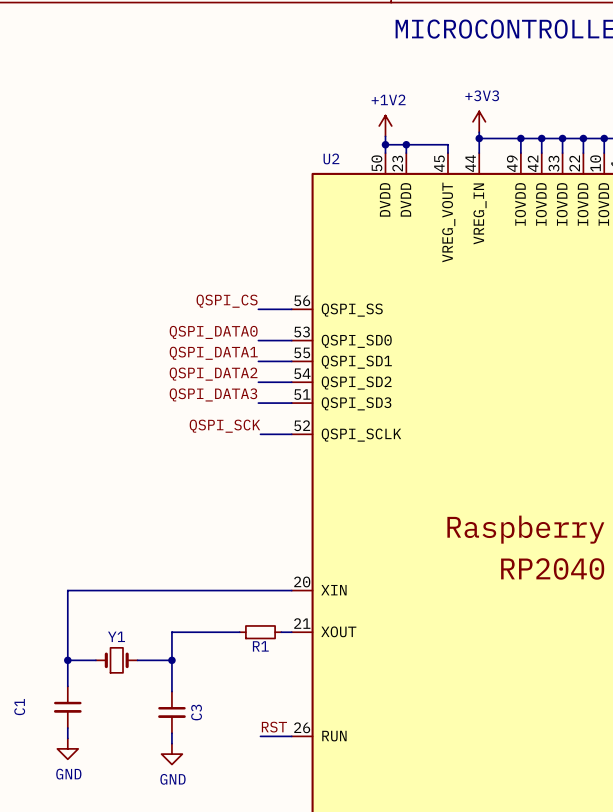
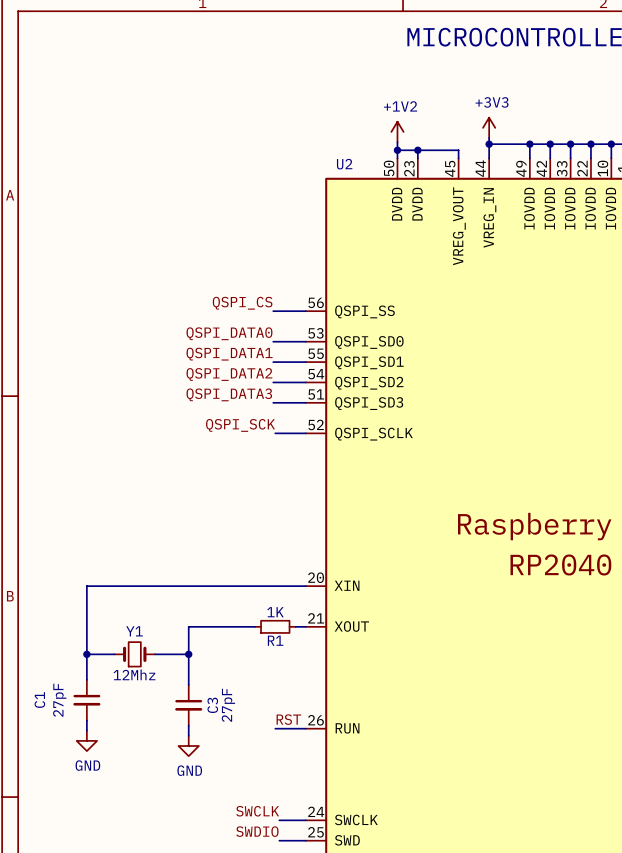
R1 value: none -> 1K (275, 612)
Y1 value: none -> 12Mhz (134, 674)
C1 value: none -> 27pF (59, 700)
C3 value: none -> 27pF (228, 705)

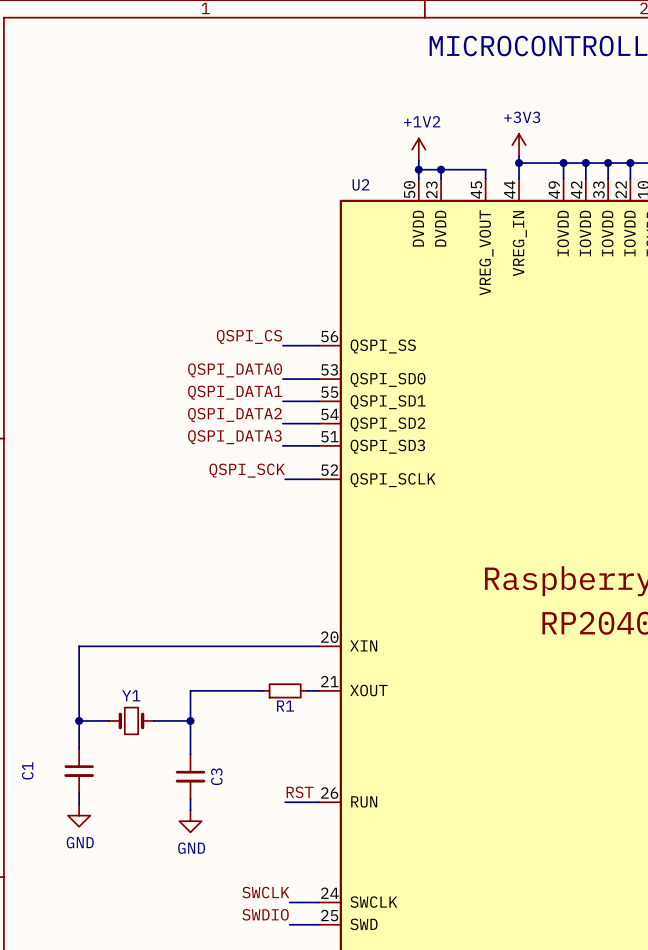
R1 value: 1K (275, 612) -> none
Y1 value: 12Mhz (134, 674) -> none
C1 value: 27pF (59, 700) -> none
C3 value: 27pF (228, 705) -> none

